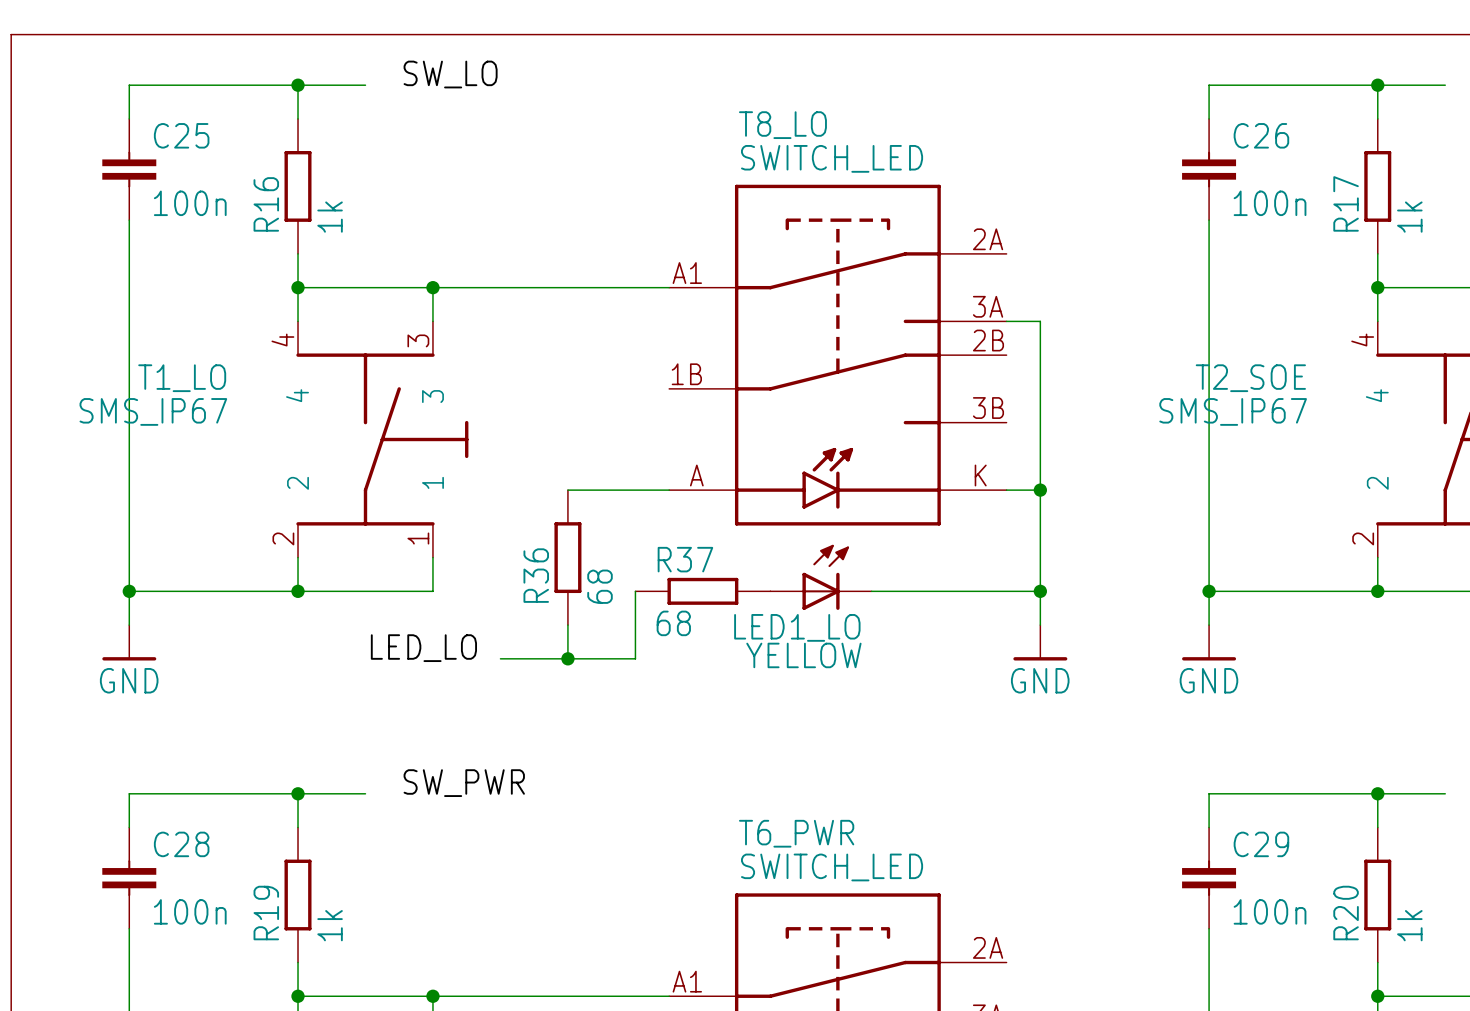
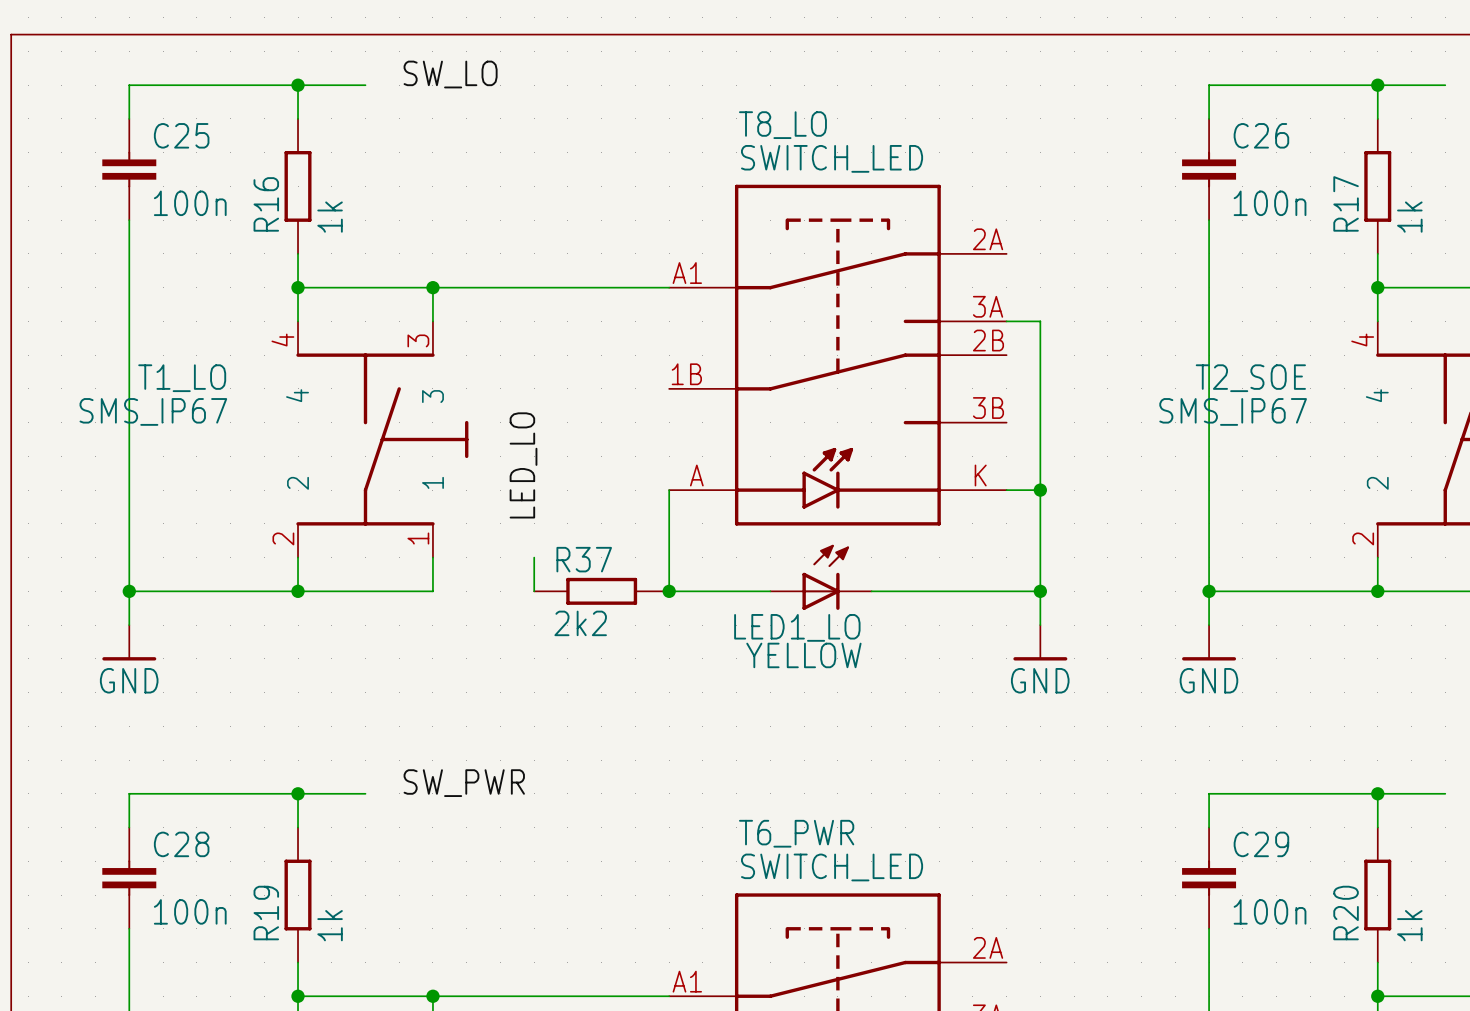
wire: (567, 490) (669, 490) -> (770, 591) (669, 591) (669, 490)
R36: 68 (567, 557) -> none
wire: (635, 591) (635, 658) (500, 658) -> none
junction: none -> (669, 591)
R37 position: (702, 591) -> (601, 591)
R37 value: 68 (673, 623) -> 2k2 (580, 623)
wire: (567, 625) (567, 658) -> (534, 557) (534, 591)
label rotation: 0° (423, 648) -> 90° counterclockwise (523, 465)
label position: LED_LO (423, 648) -> LED_LO (523, 465)
junction: (567, 658) -> none

